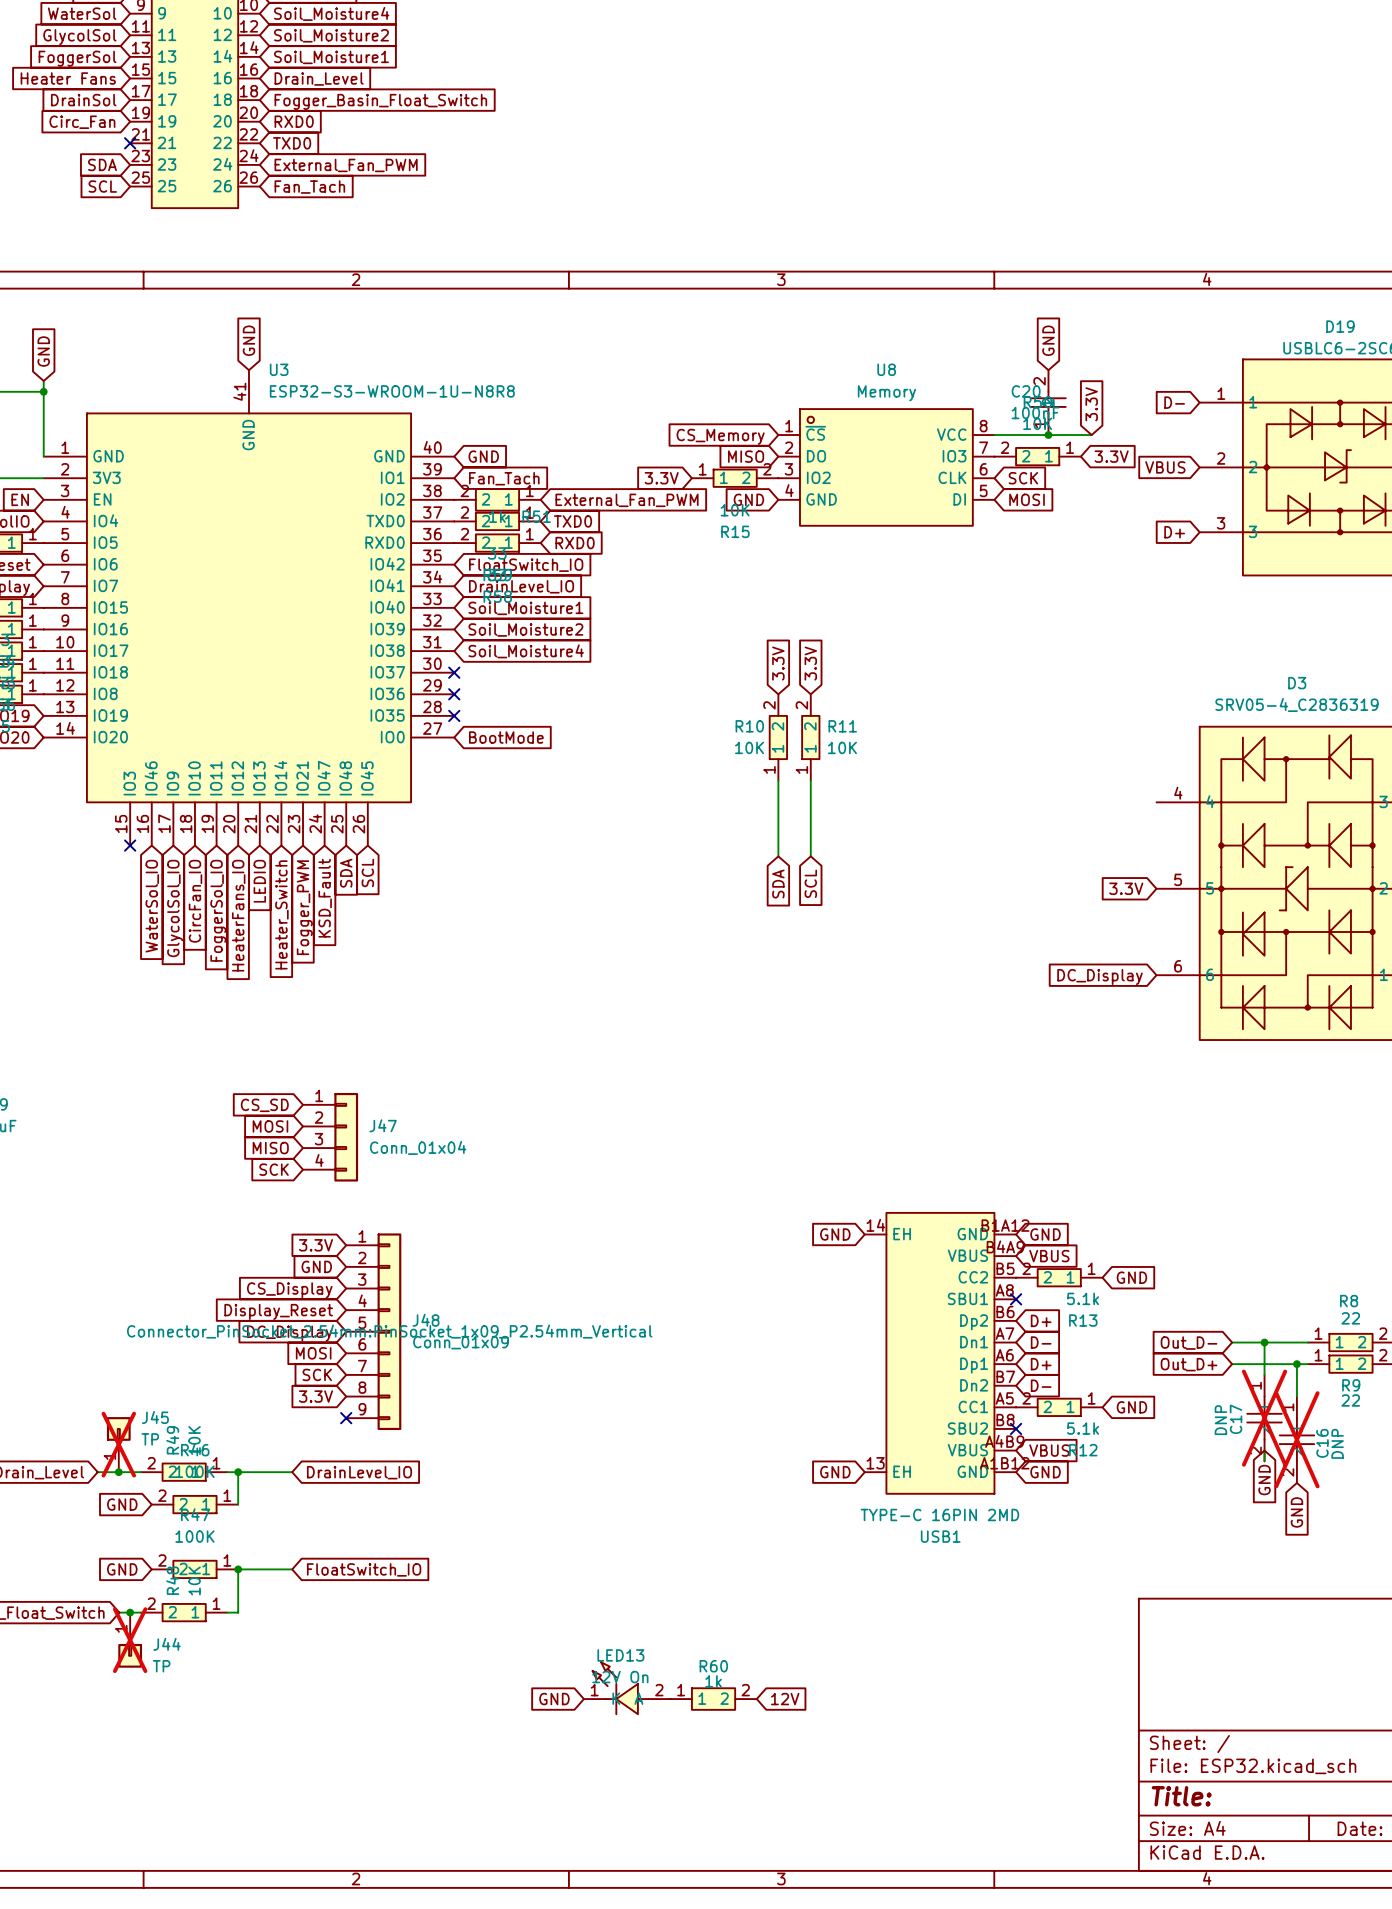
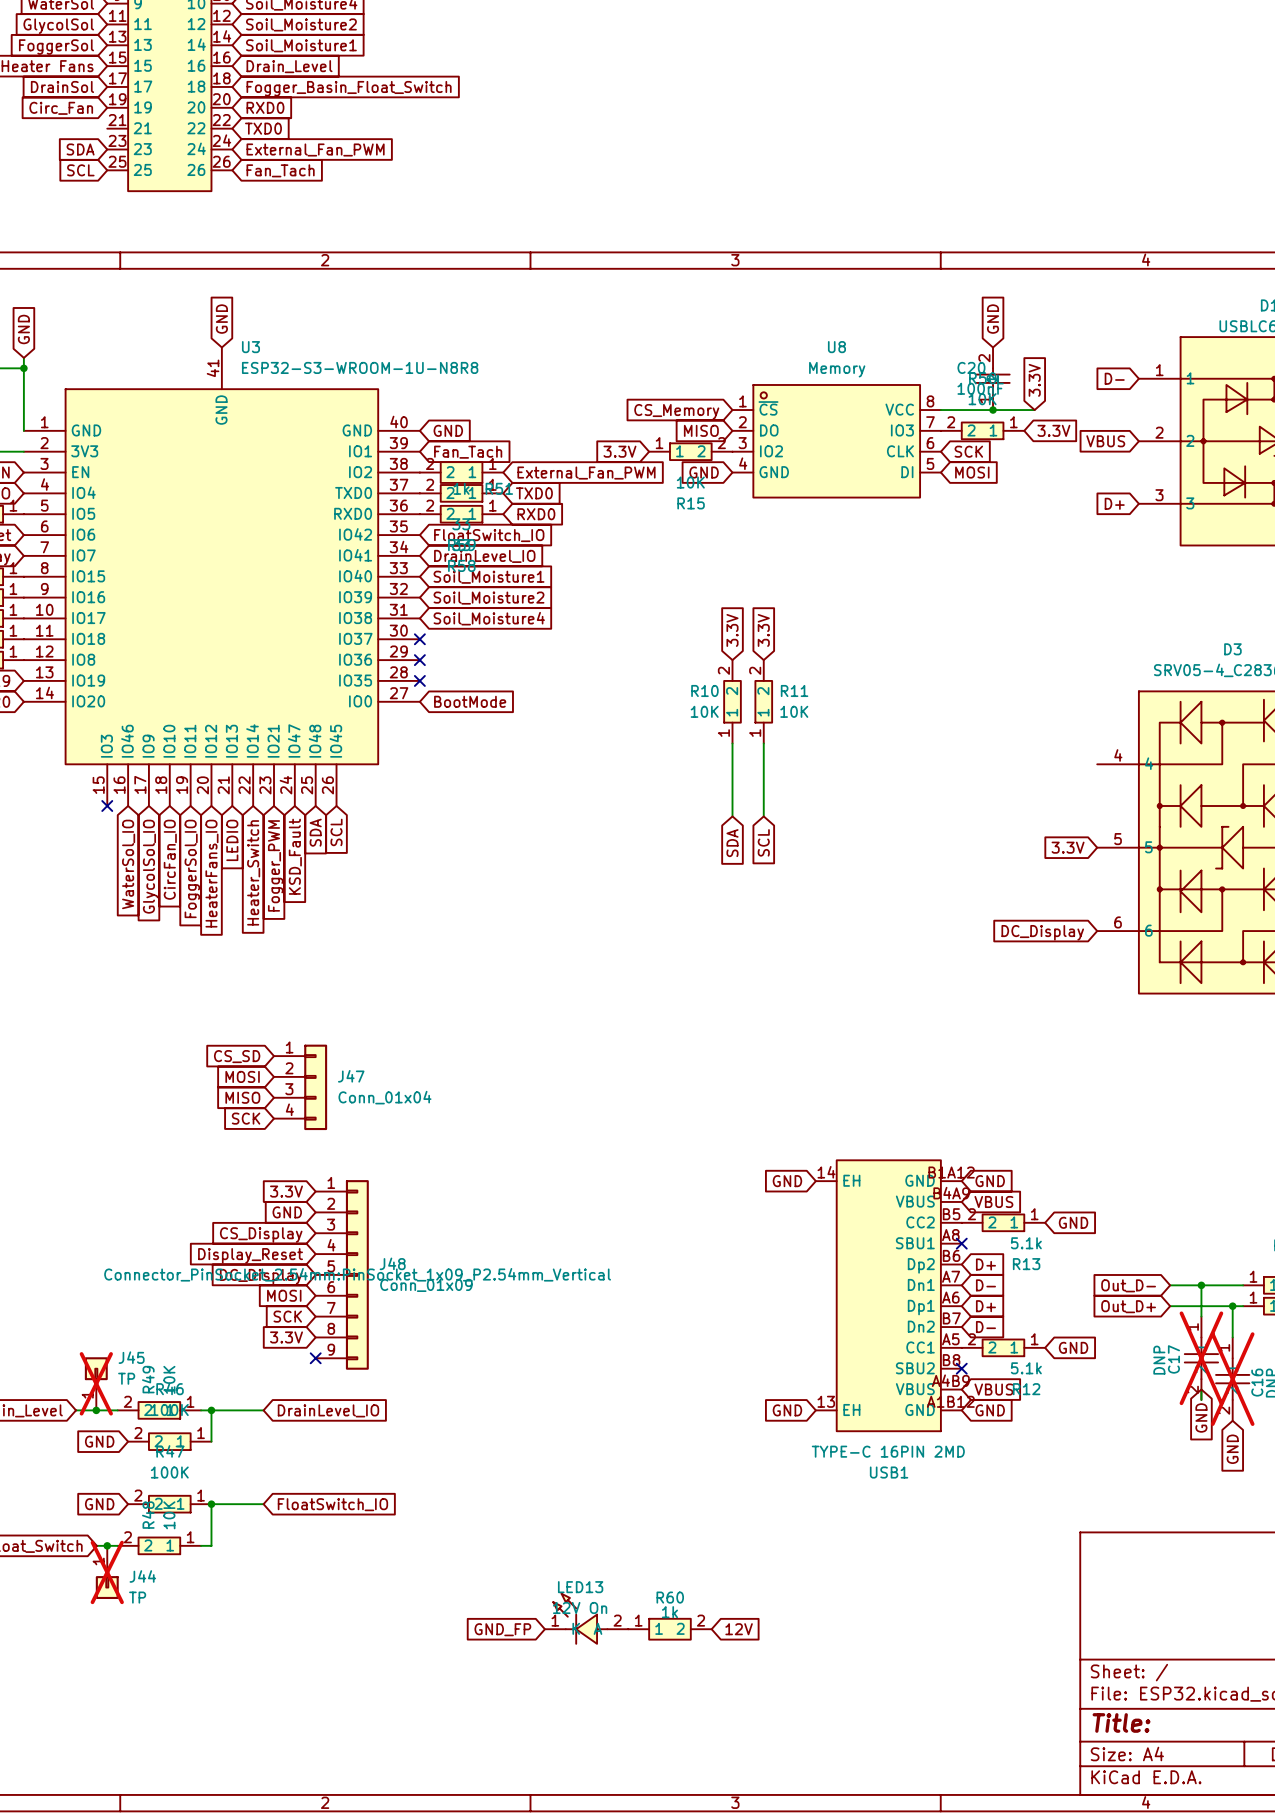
no-connect mark: (130, 143) -> none
global label: GND (554, 1699) -> GND_FP (502, 1629)

